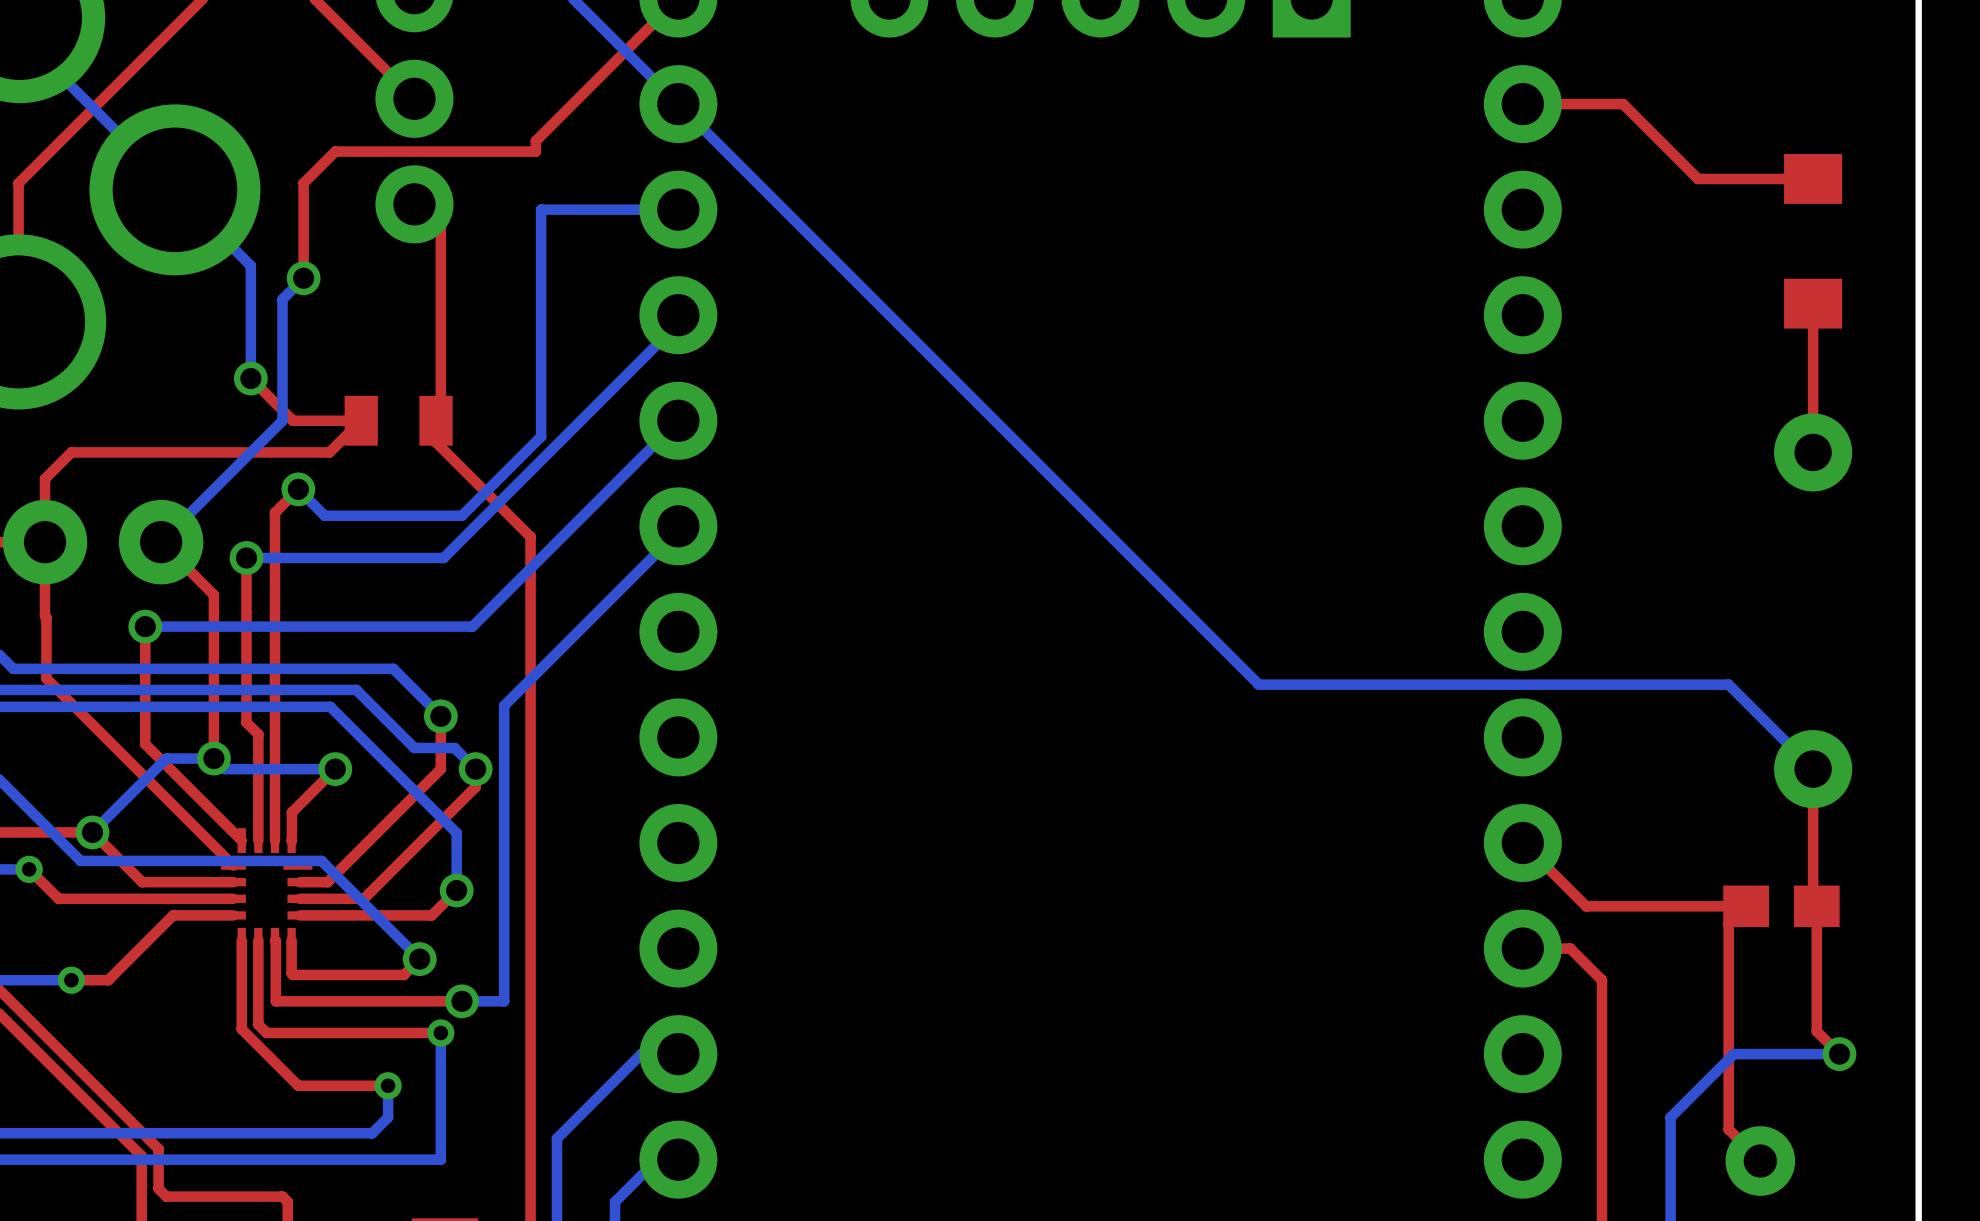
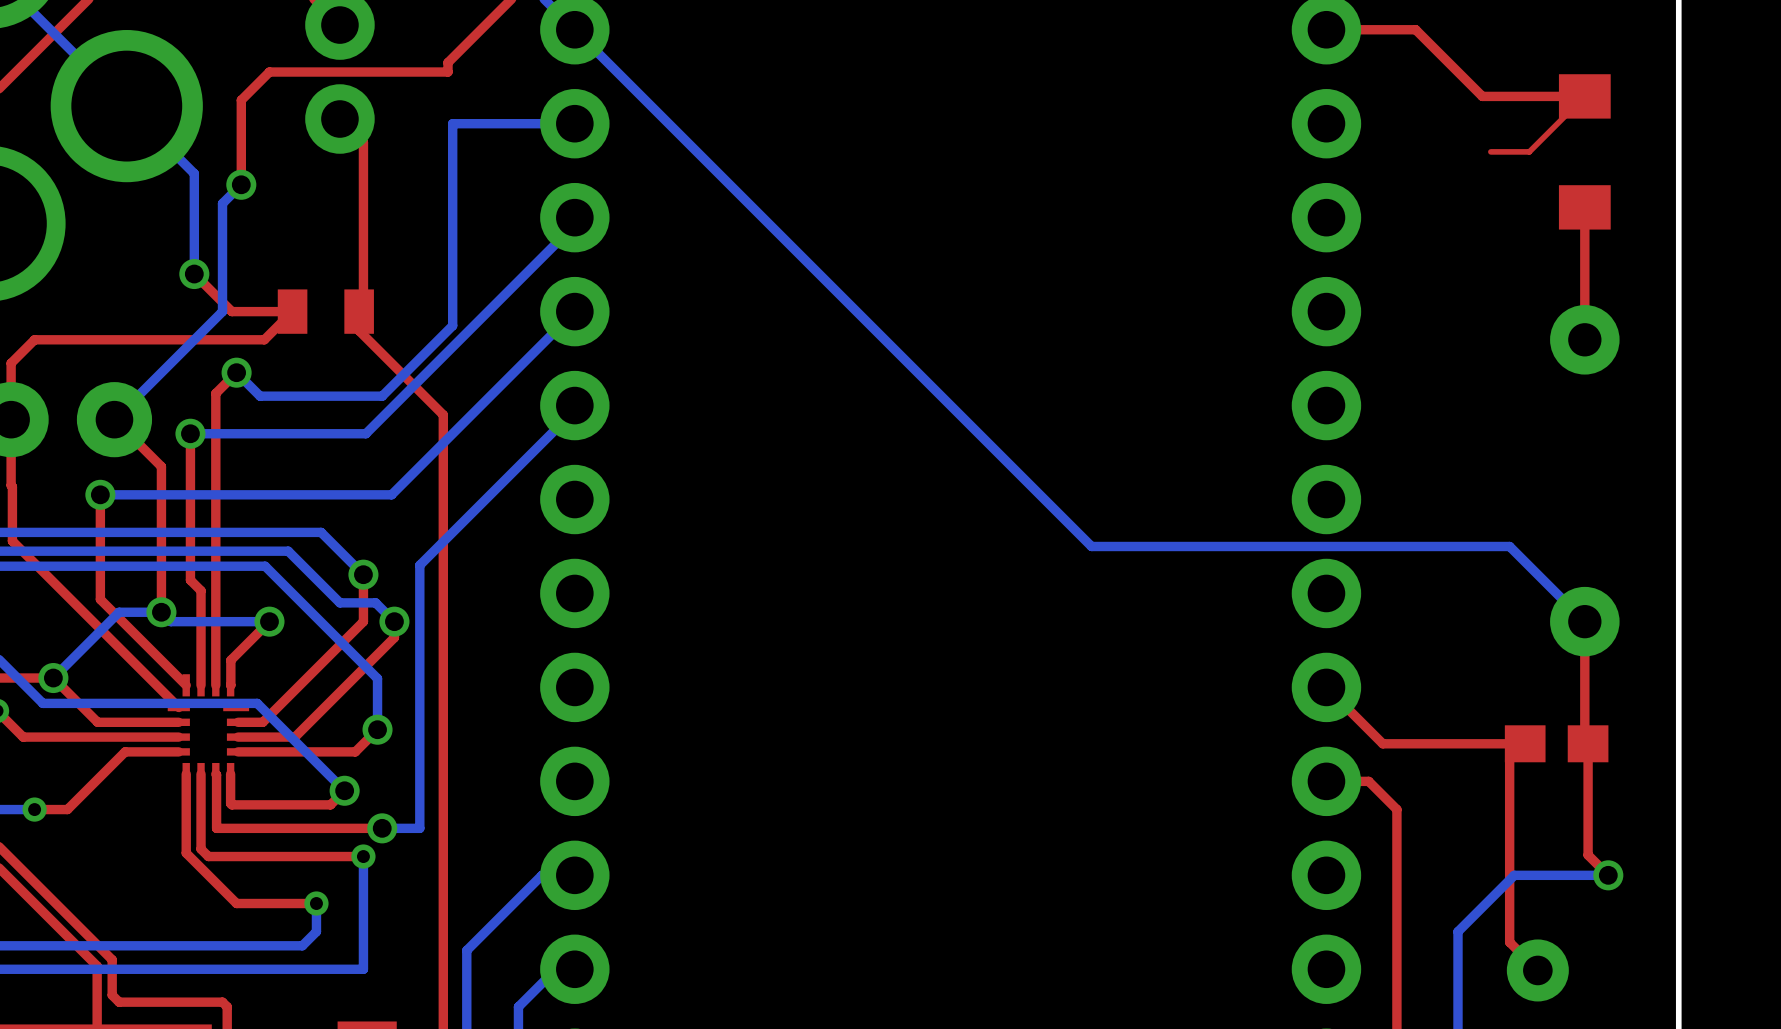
top track: none -> (1584, 96) (1529, 151) (1490, 151)

